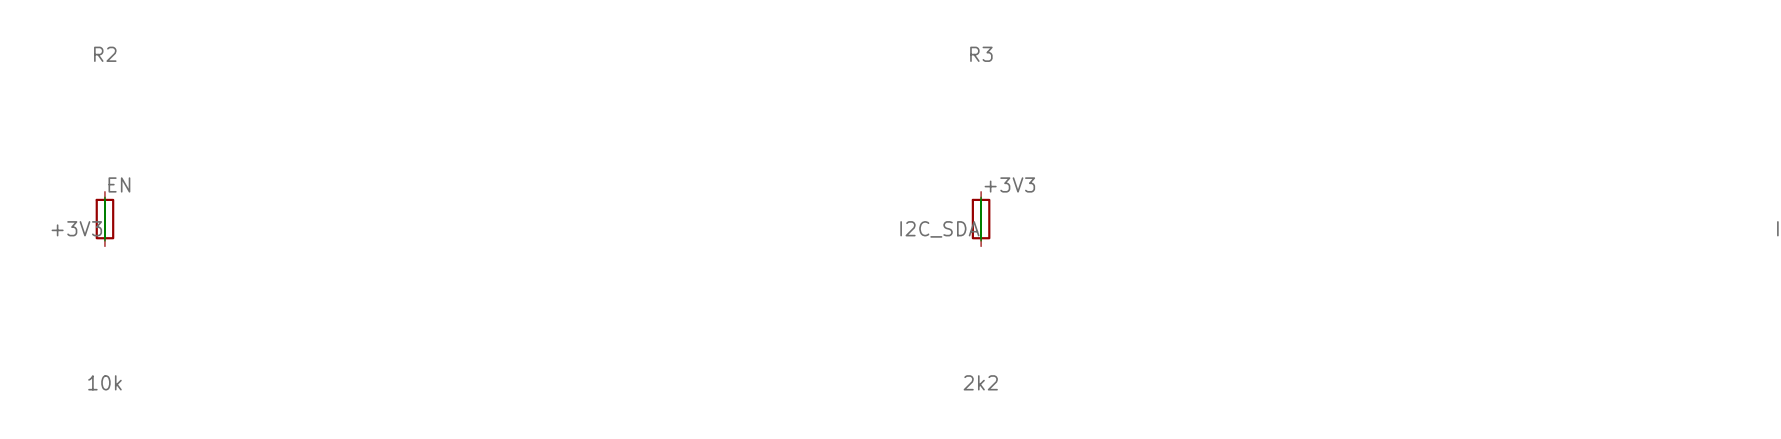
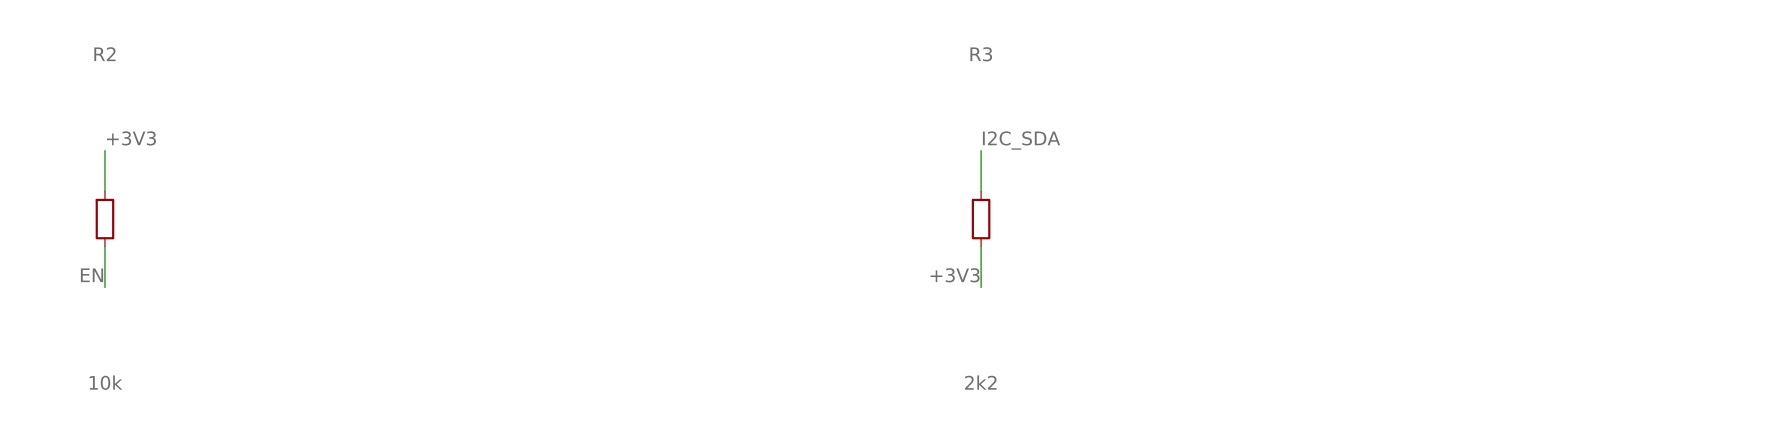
wire: none -> (104, 150) (104, 191)
wire: none -> (981, 150) (981, 191)
label position: EN (119, 184) -> EN (92, 275)
label position: +3V3 (1009, 184) -> +3V3 (955, 275)
wire: (104, 197) (104, 240) -> none
wire: (981, 197) (981, 240) -> none
label position: +3V3 (76, 228) -> +3V3 (131, 138)
label position: I2C_SDA (939, 229) -> I2C_SDA (1021, 140)
wire: none -> (104, 246) (104, 287)
wire: none -> (981, 246) (981, 287)

